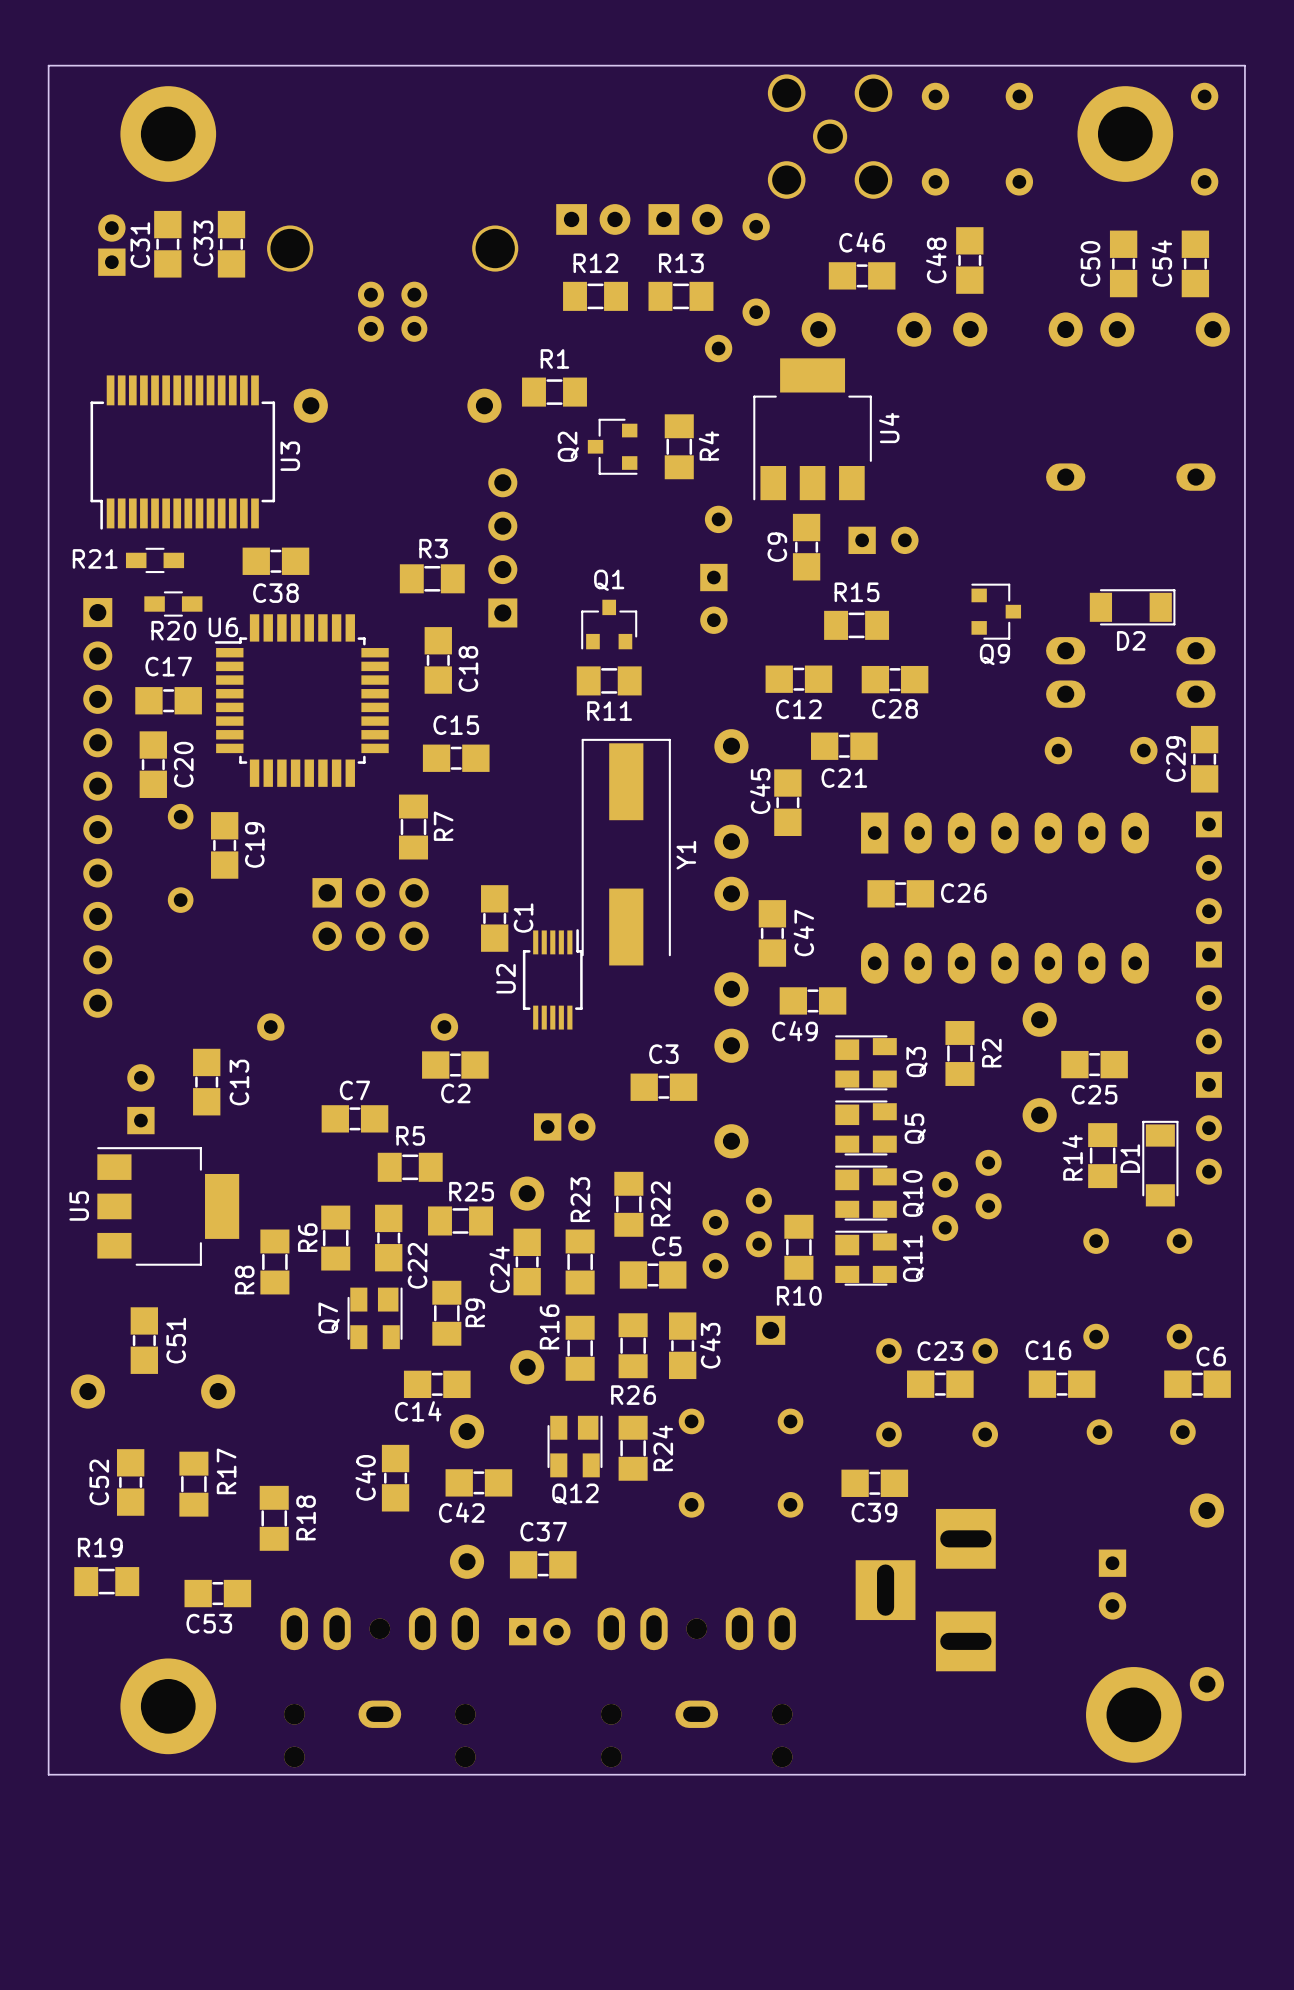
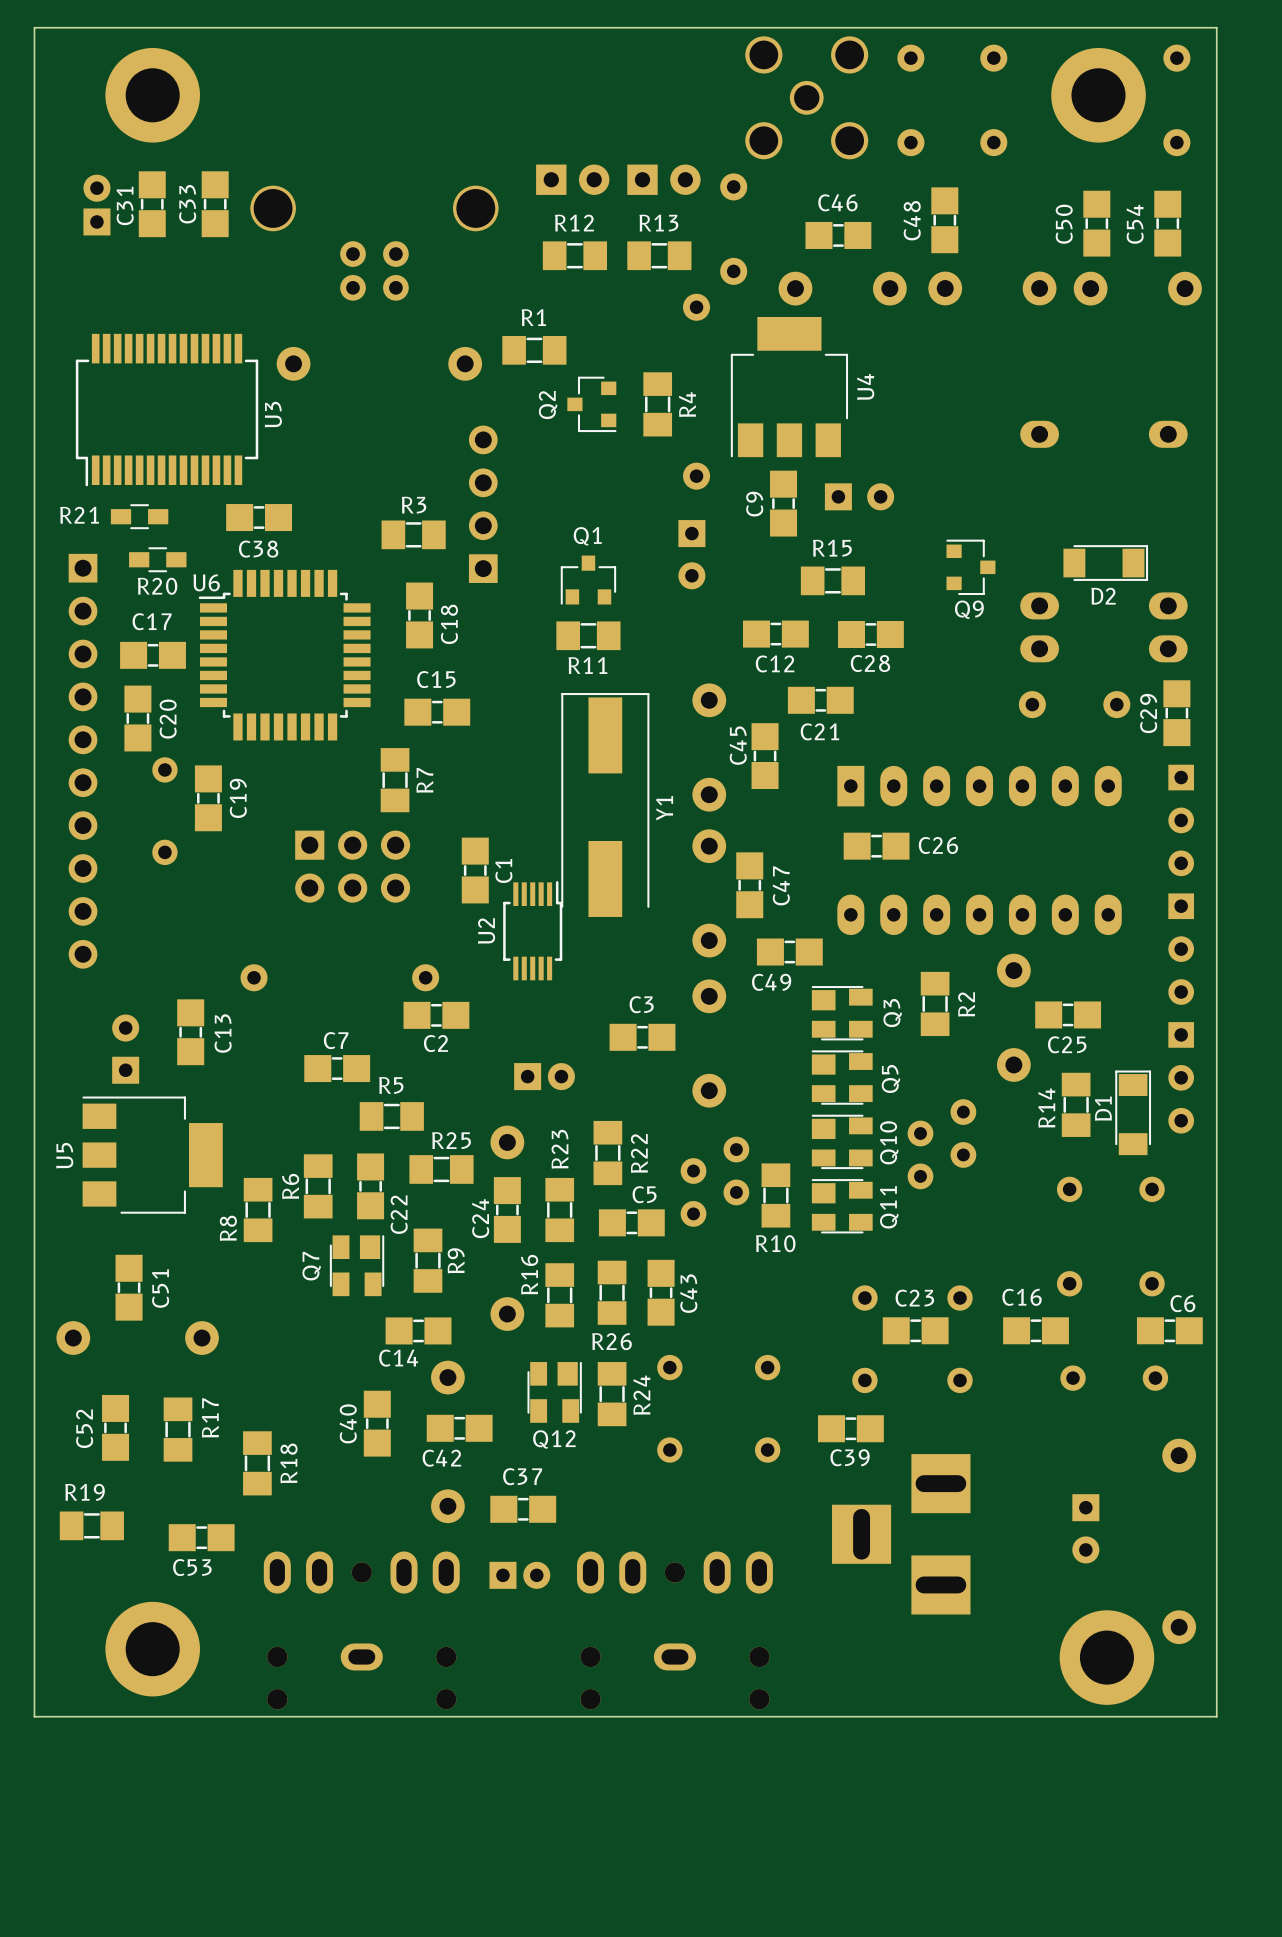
part: (770, 1330) -> none

